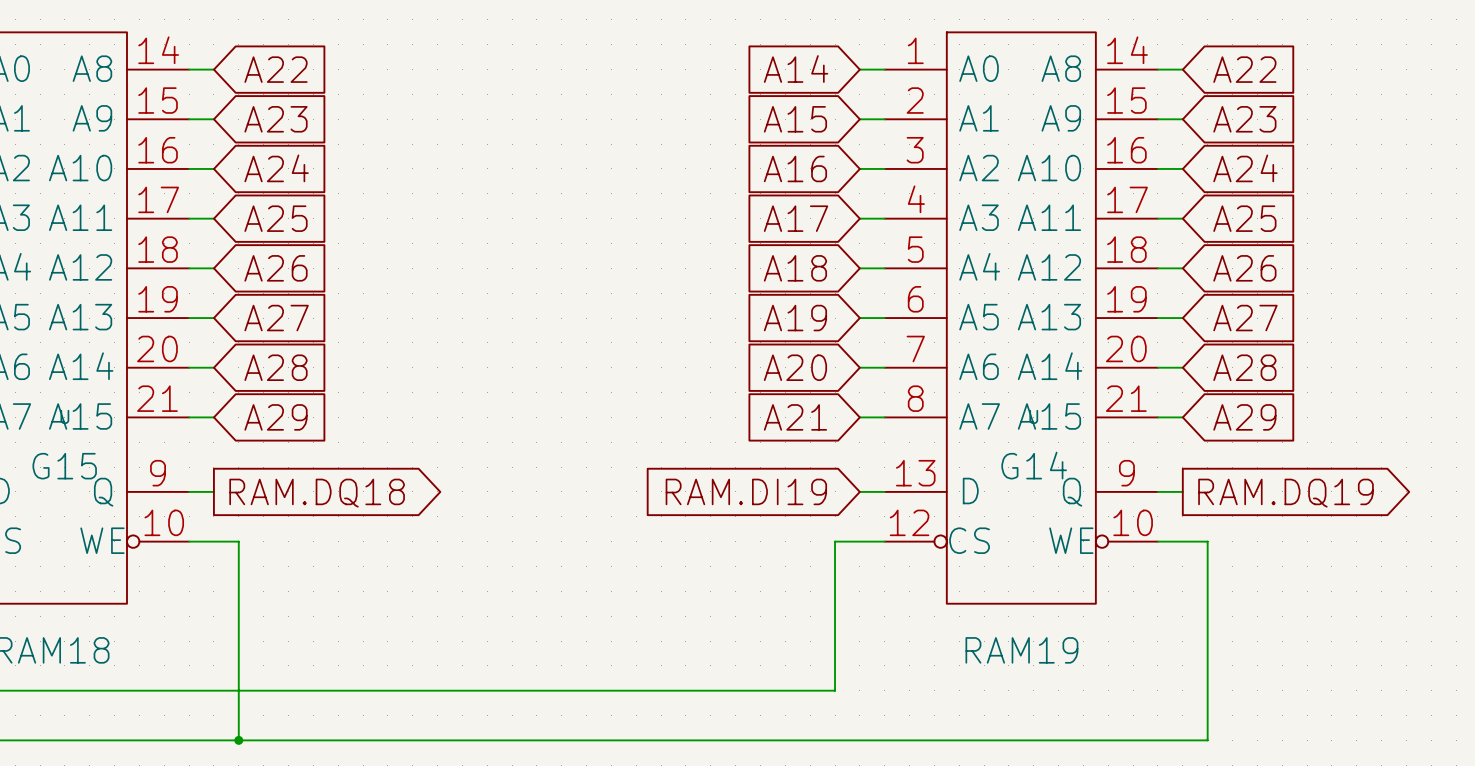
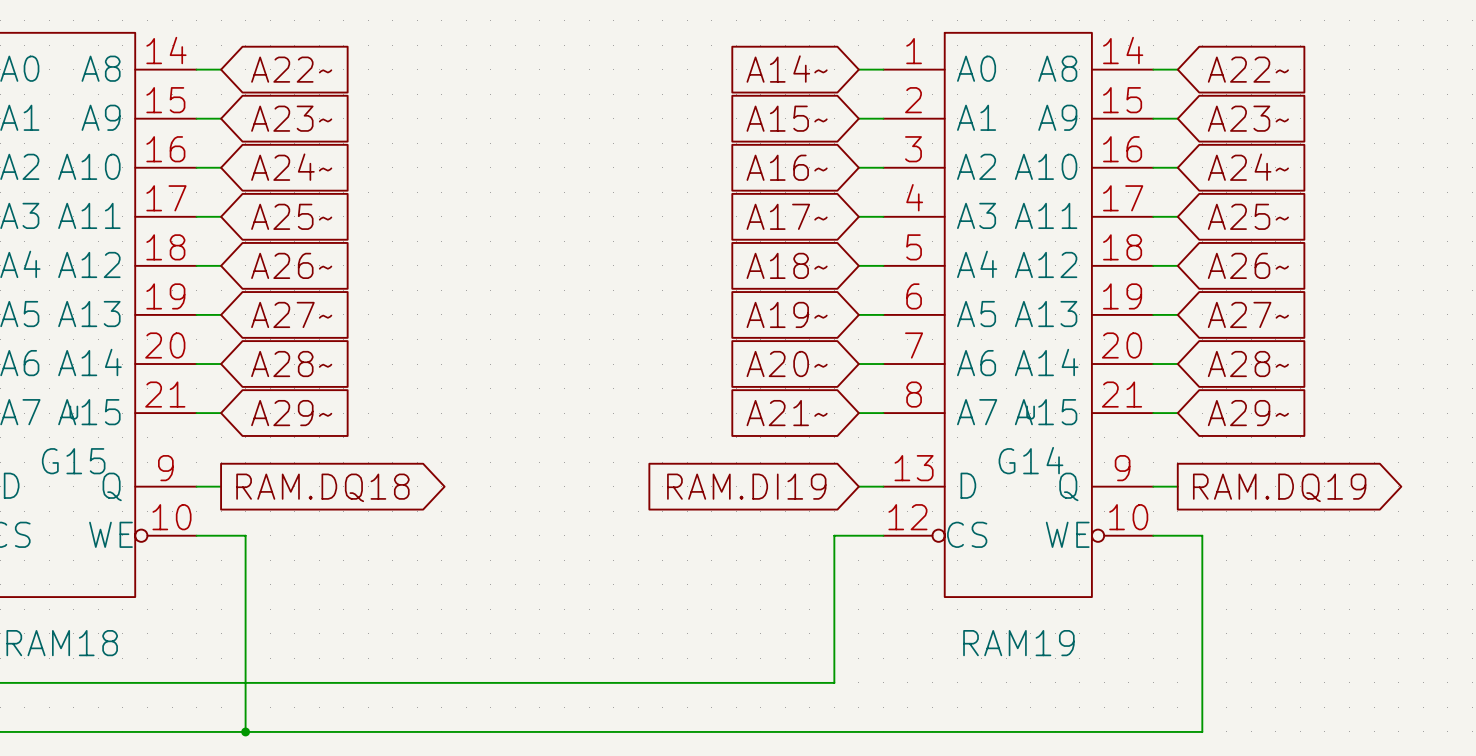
global label: A22 (276, 69) -> A22~ (291, 69)
global label: A14 (796, 69) -> A14~ (787, 69)
global label: A22 (1244, 69) -> A22~ (1248, 69)
global label: A23 (276, 119) -> A23~ (291, 118)
global label: A15 (795, 119) -> A15~ (787, 118)
global label: A23 (1244, 119) -> A23~ (1248, 118)
global label: A24 (276, 168) -> A24~ (291, 167)
global label: A16 (795, 168) -> A16~ (787, 167)
global label: A24 (1245, 168) -> A24~ (1248, 167)
global label: A25 (276, 218) -> A25~ (291, 216)
global label: A17 (796, 218) -> A17~ (787, 216)
global label: A25 (1244, 218) -> A25~ (1248, 216)
global label: A26 (276, 268) -> A26~ (291, 265)
global label: A18 (795, 268) -> A18~ (787, 265)
global label: A26 (1244, 268) -> A26~ (1248, 265)
global label: A27 (276, 318) -> A27~ (291, 314)
global label: A19 (795, 318) -> A19~ (787, 314)
global label: A27 (1245, 318) -> A27~ (1248, 314)
global label: A28 (276, 367) -> A28~ (291, 364)
global label: A20 (795, 367) -> A20~ (787, 364)
global label: A28 (1244, 367) -> A28~ (1248, 364)
global label: A29 (276, 417) -> A29~ (291, 413)
global label: A21 (795, 417) -> A21~ (787, 413)
global label: A29 (1244, 417) -> A29~ (1248, 413)

